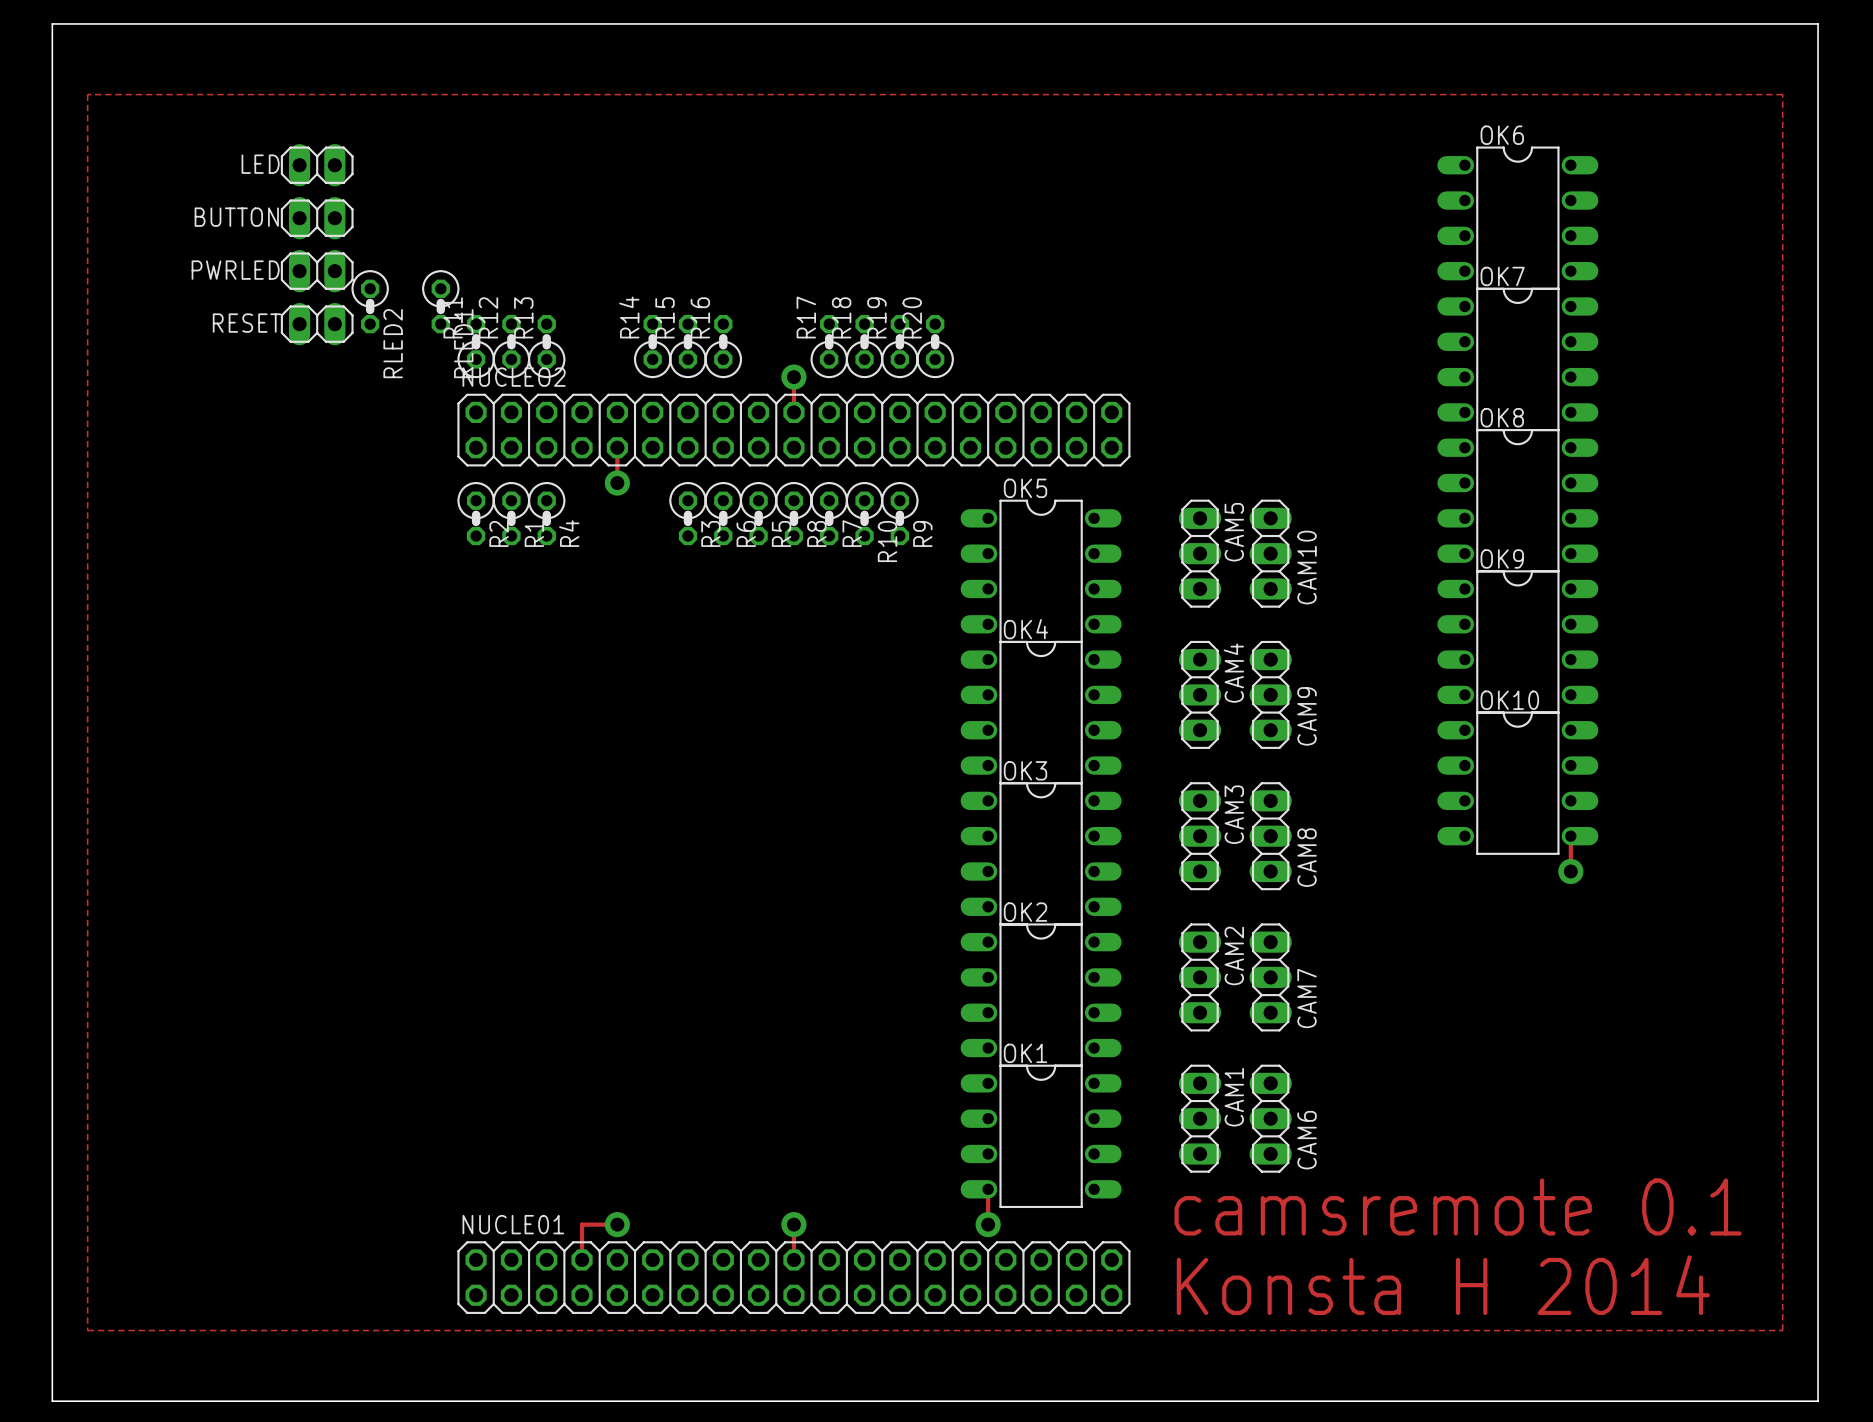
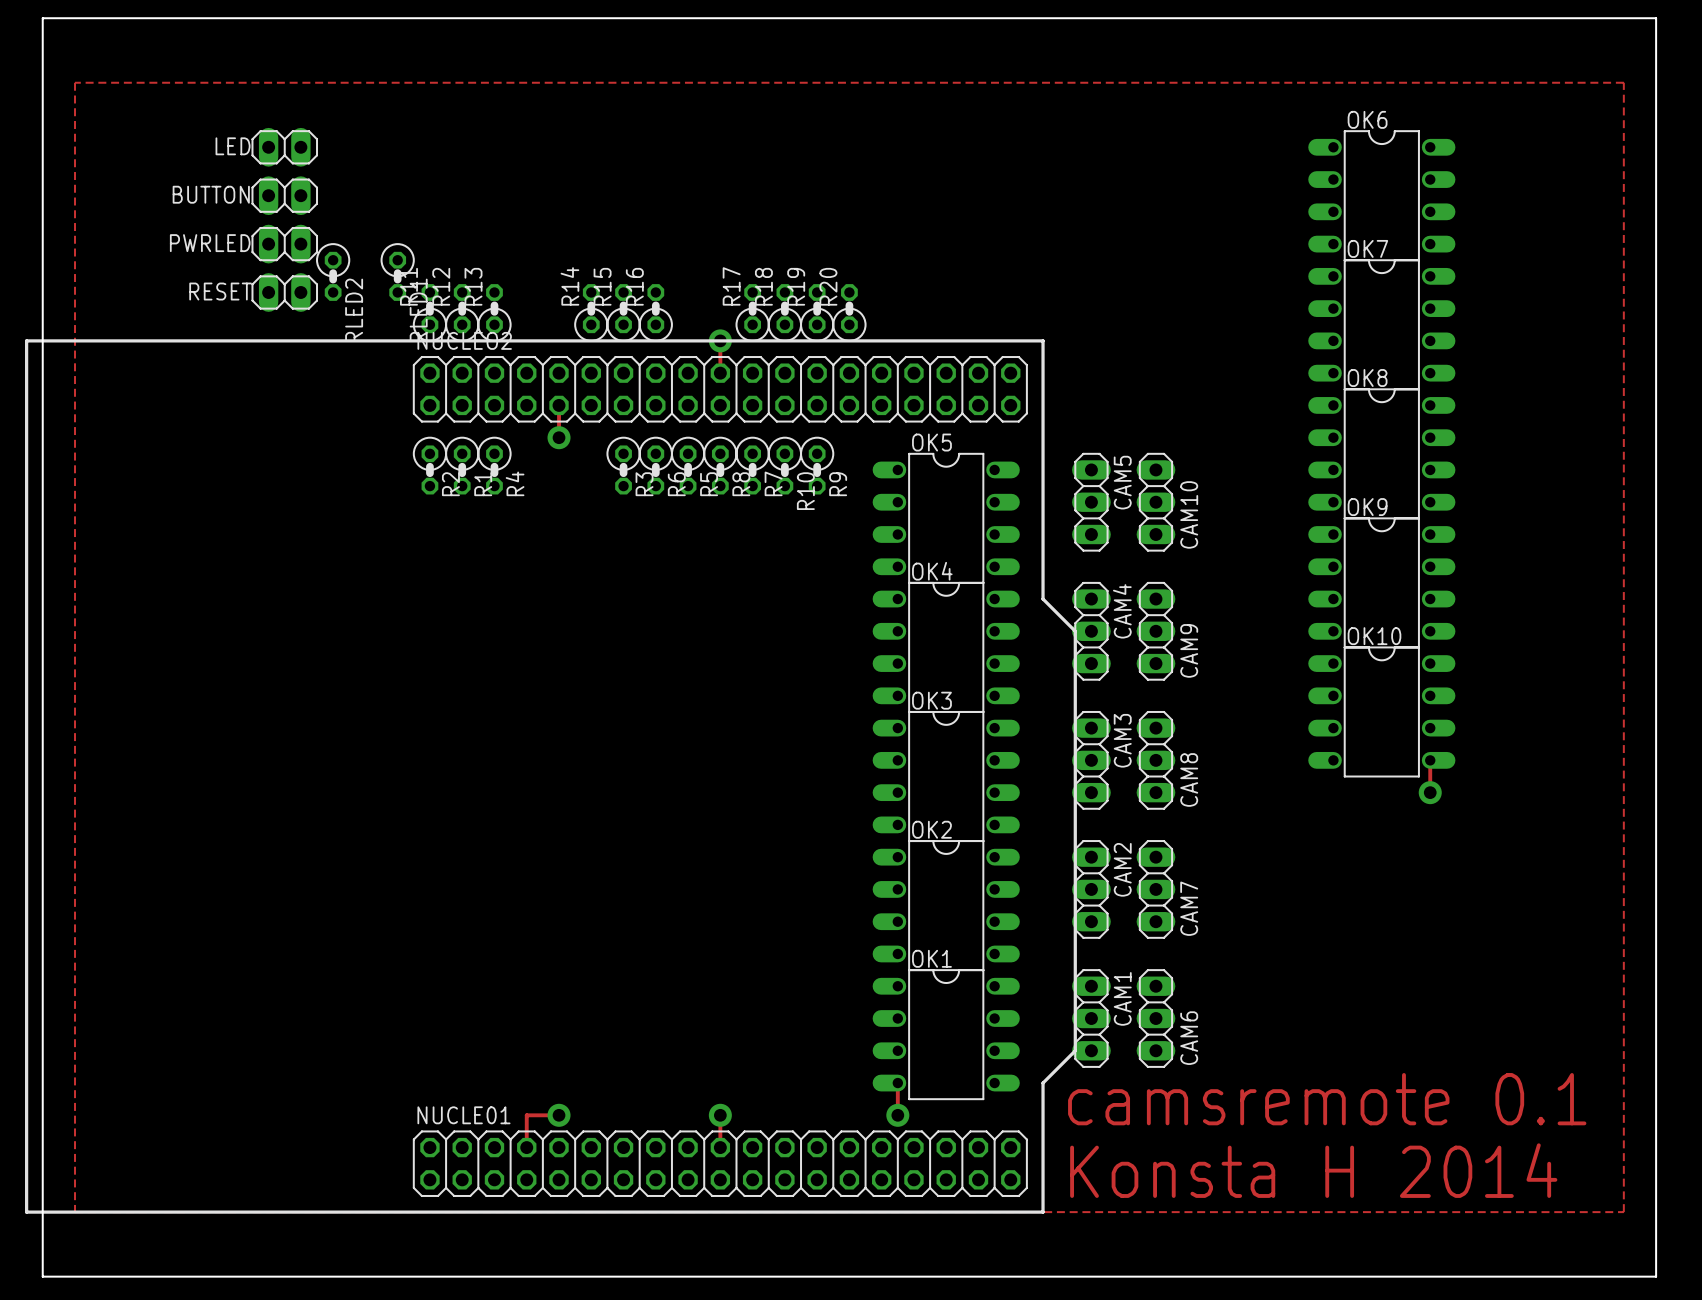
line: none -> (26, 340) (1043, 340) (1043, 599) (1075, 631) (1075, 1050) (1043, 1083) (1043, 1212) (26, 1212) (26, 340)

